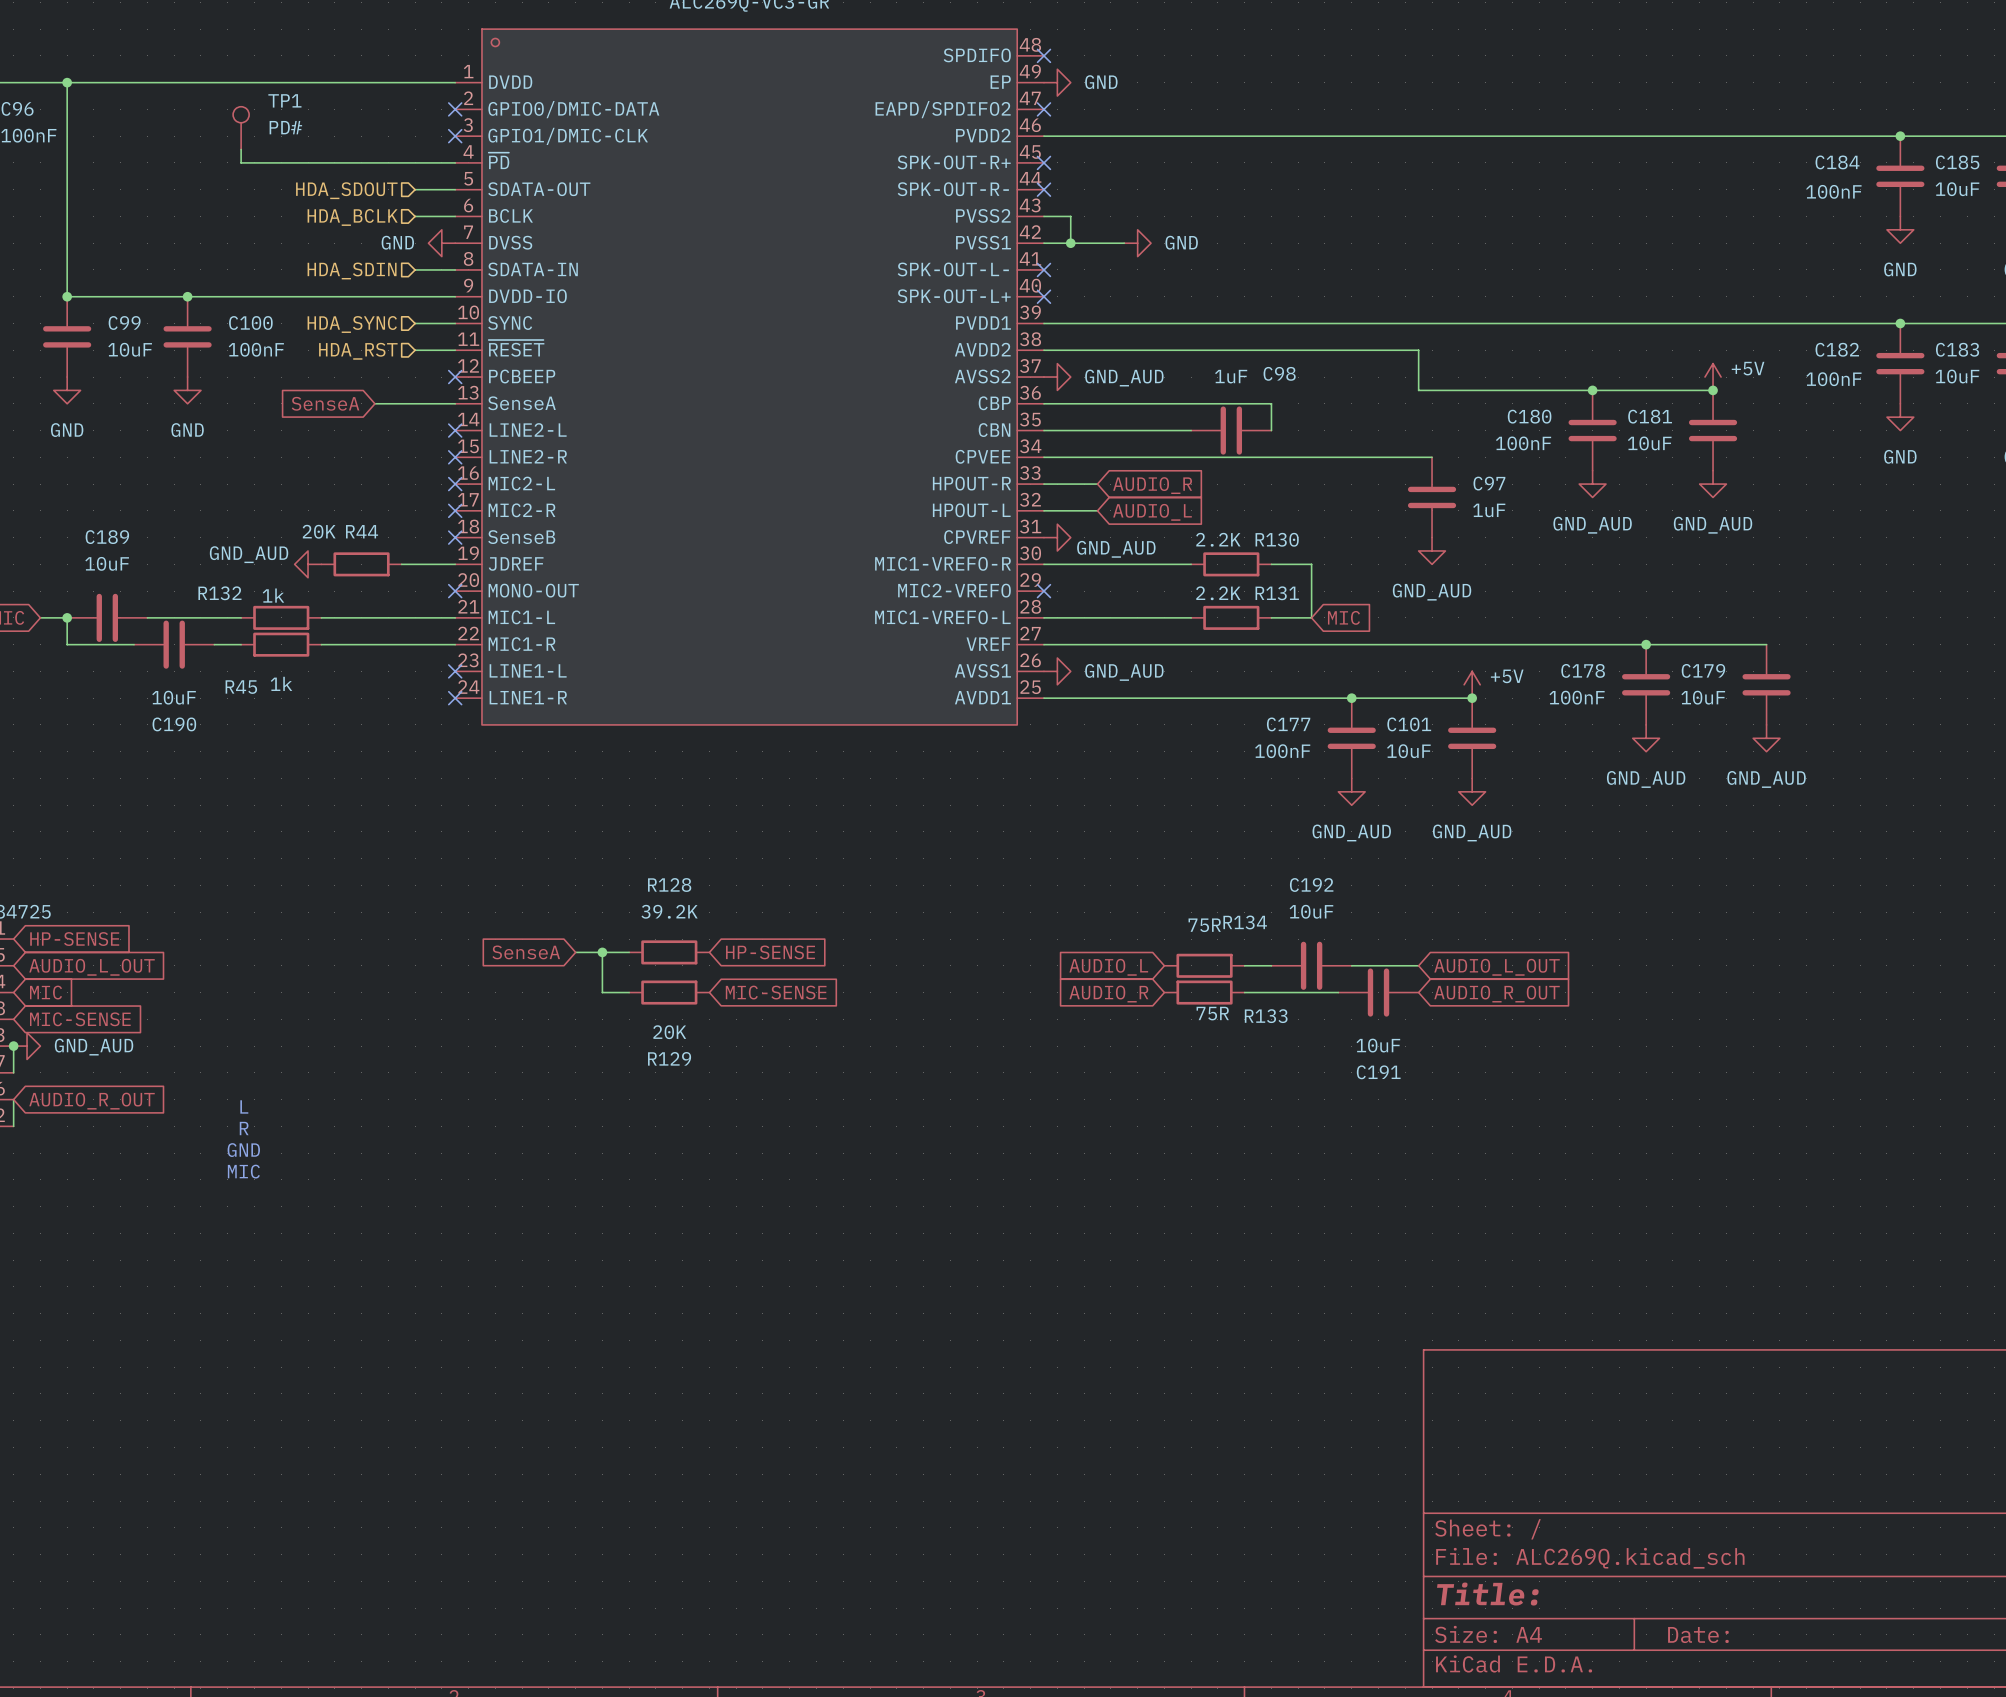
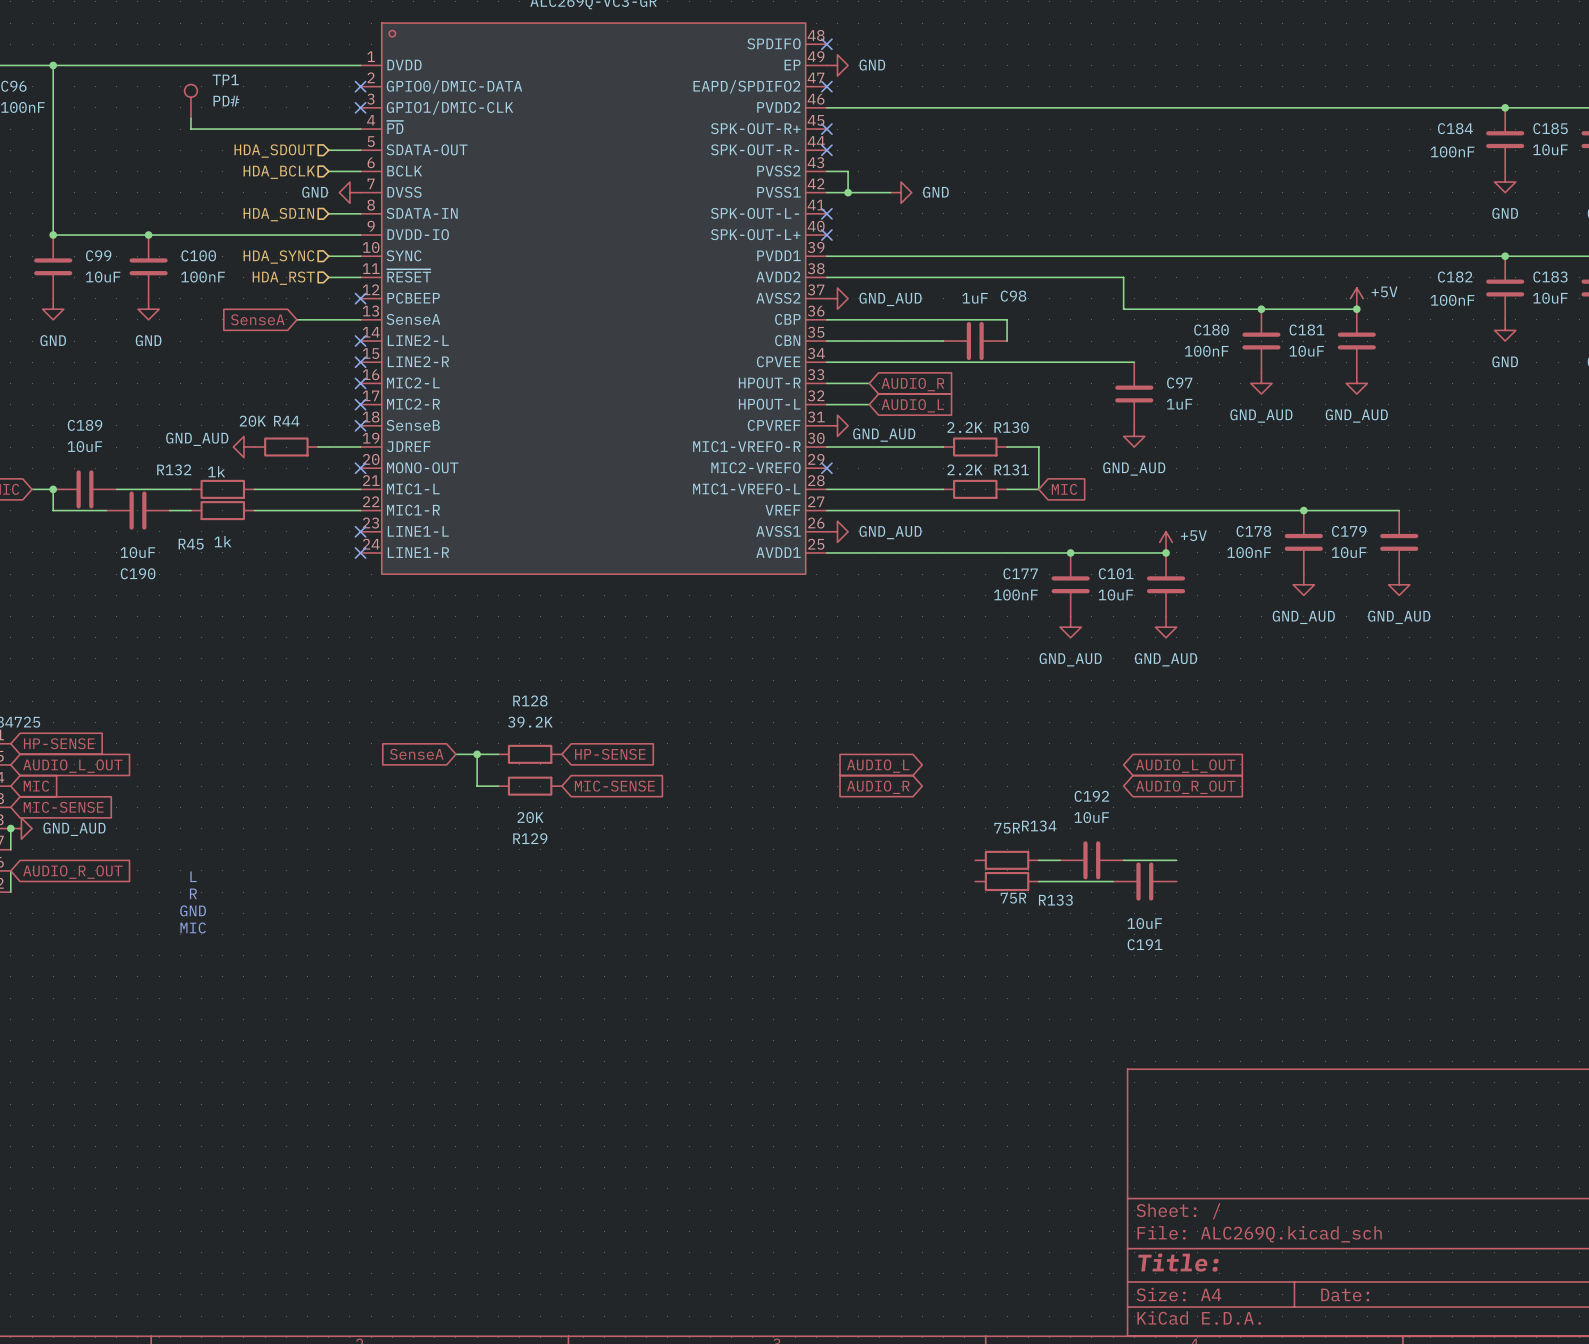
R134 position: (1204, 965) -> (1007, 860)
wire: (1244, 965) (1271, 965) -> (1038, 860) (1060, 860)
C192 position: (1311, 965) -> (1091, 860)
wire: (1351, 965) (1418, 965) -> (1123, 860) (1176, 860)
R133 position: (1204, 992) -> (1007, 881)
wire: (1244, 992) (1338, 992) -> (1038, 881) (1113, 881)
C191 position: (1378, 992) -> (1144, 881)

